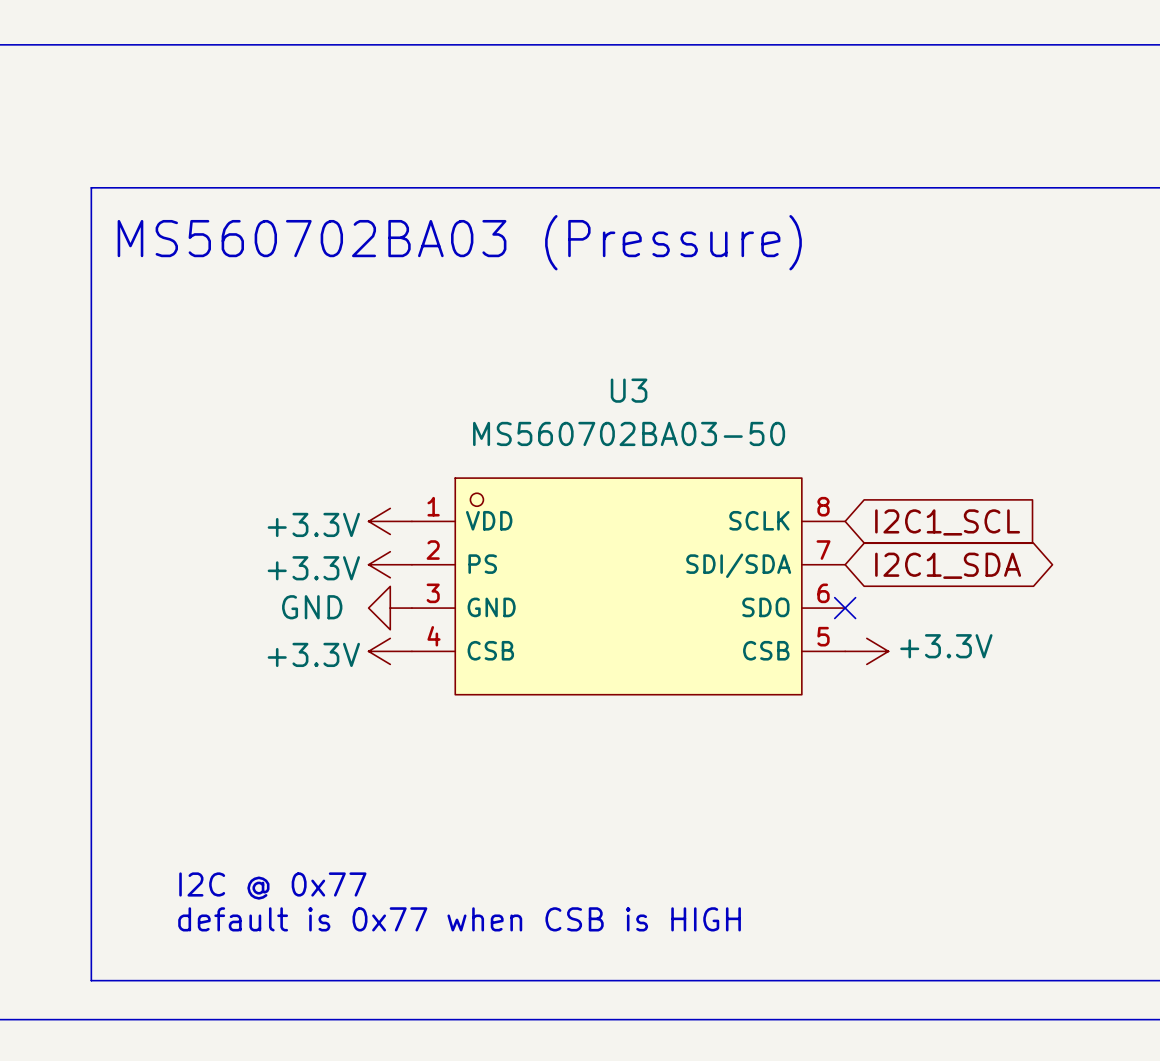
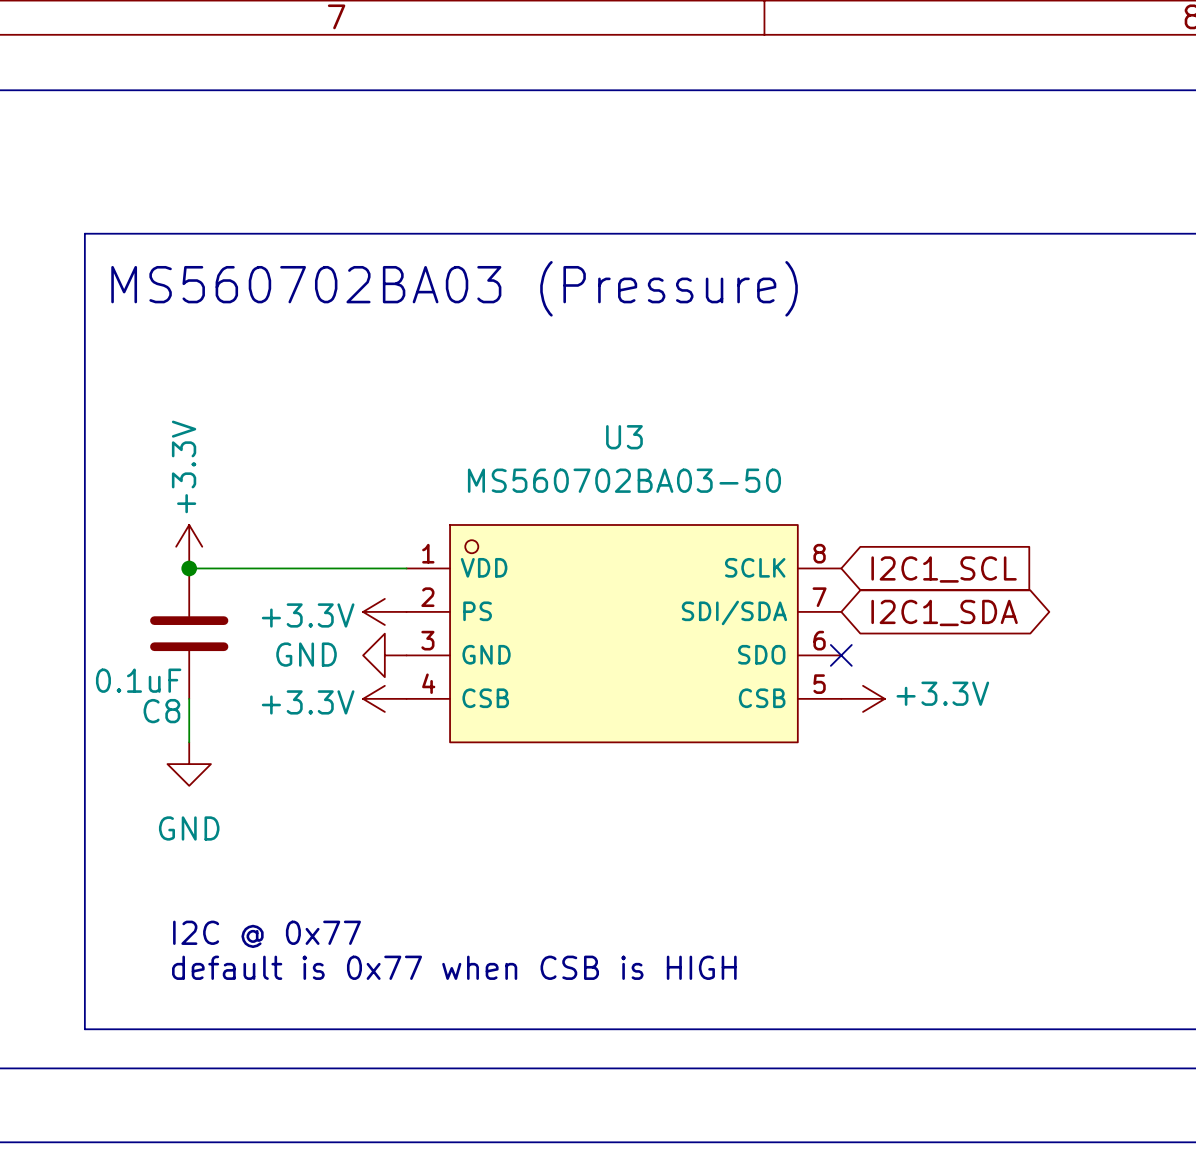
wire: none -> (189, 568) (406, 568)
junction: none -> (189, 568)
power symbol rotation: 0° (390, 521) -> 90° clockwise (189, 546)
power symbol position: +3.3V (390, 521) -> +3.3V (189, 546)
C8: none -> 0.1uF (189, 633)
wire: none -> (189, 698) (189, 742)
power symbol: none -> GND (189, 764)

